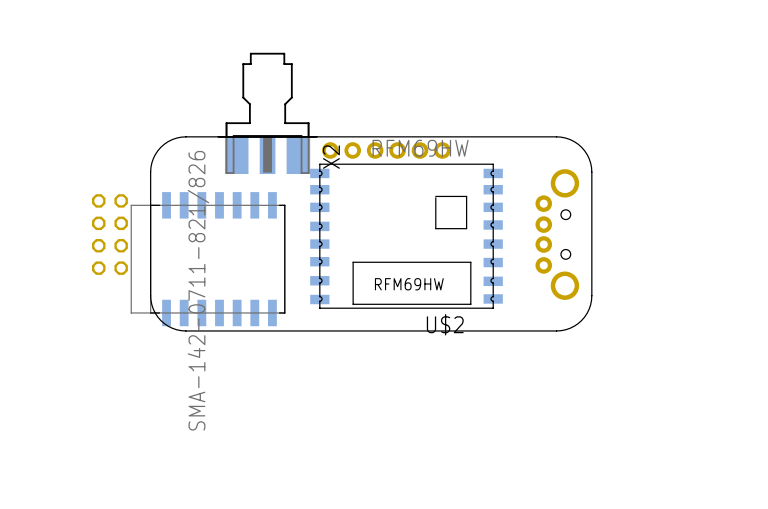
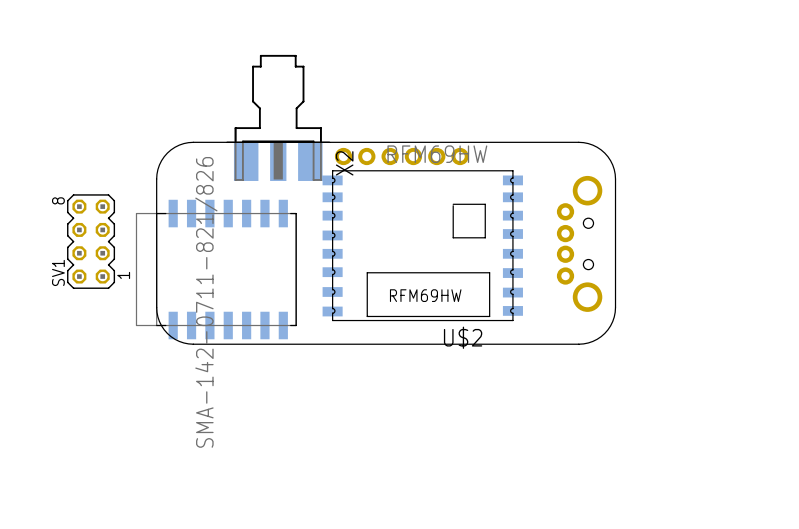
SV1 side: top (109, 234) -> bottom (91, 241)

